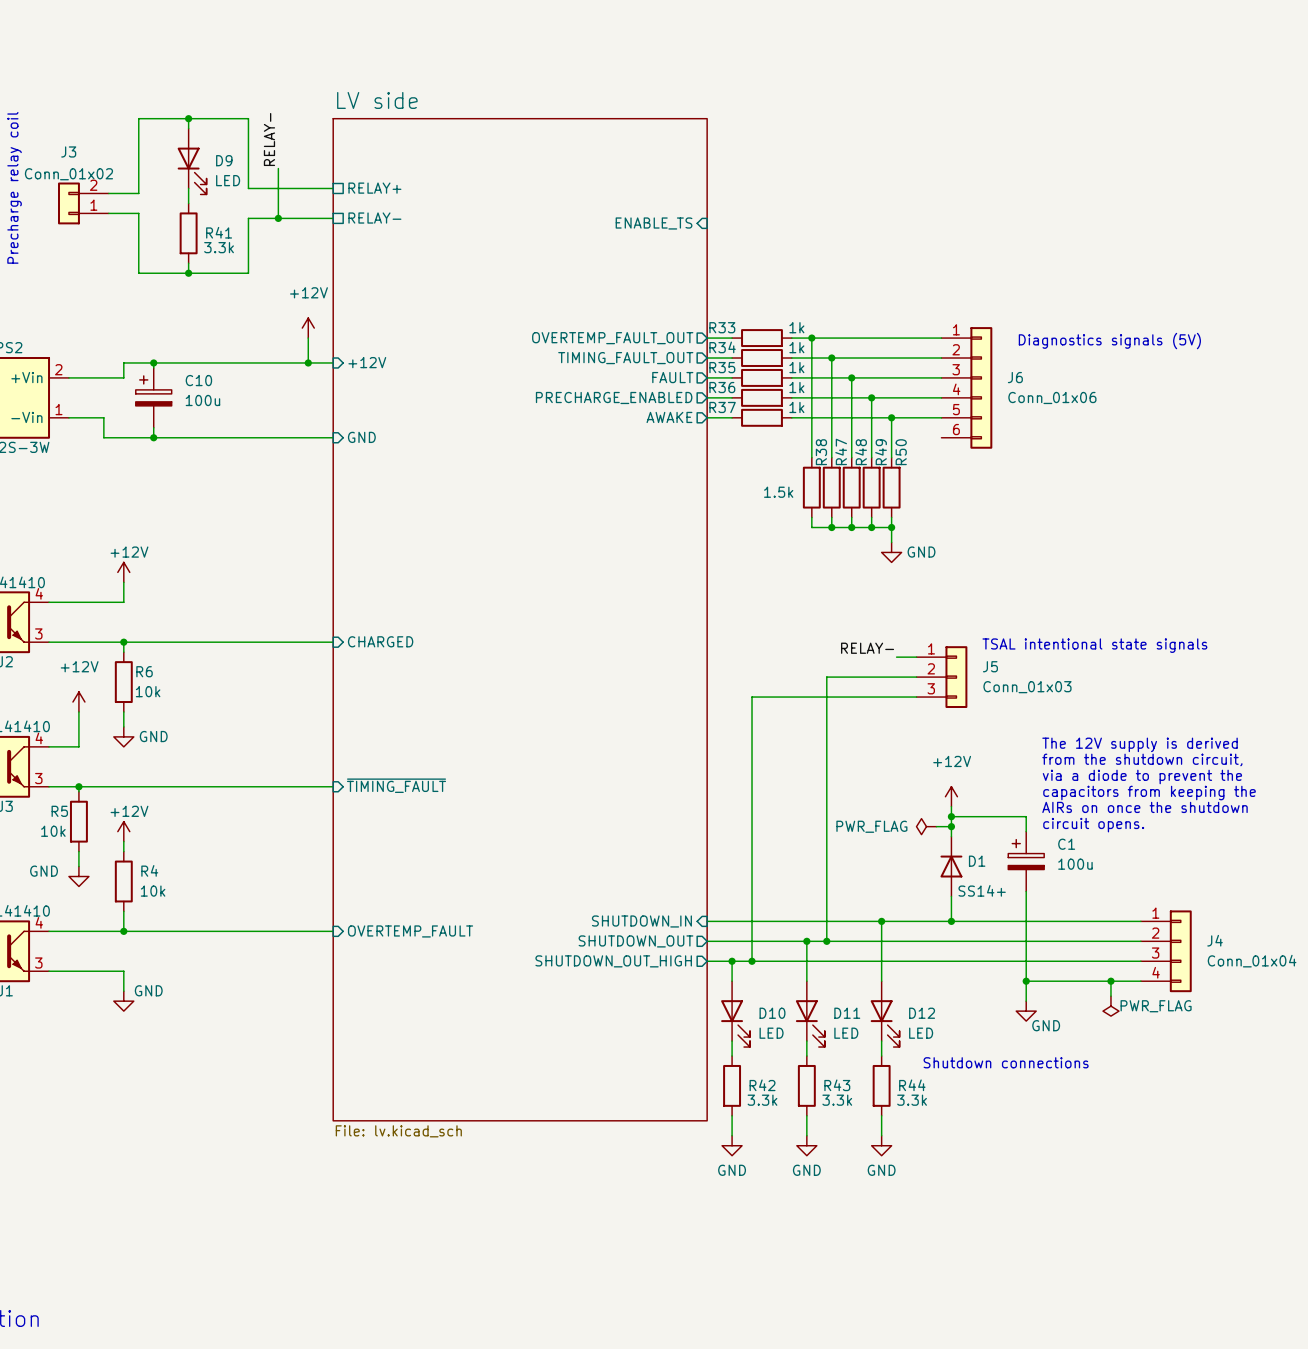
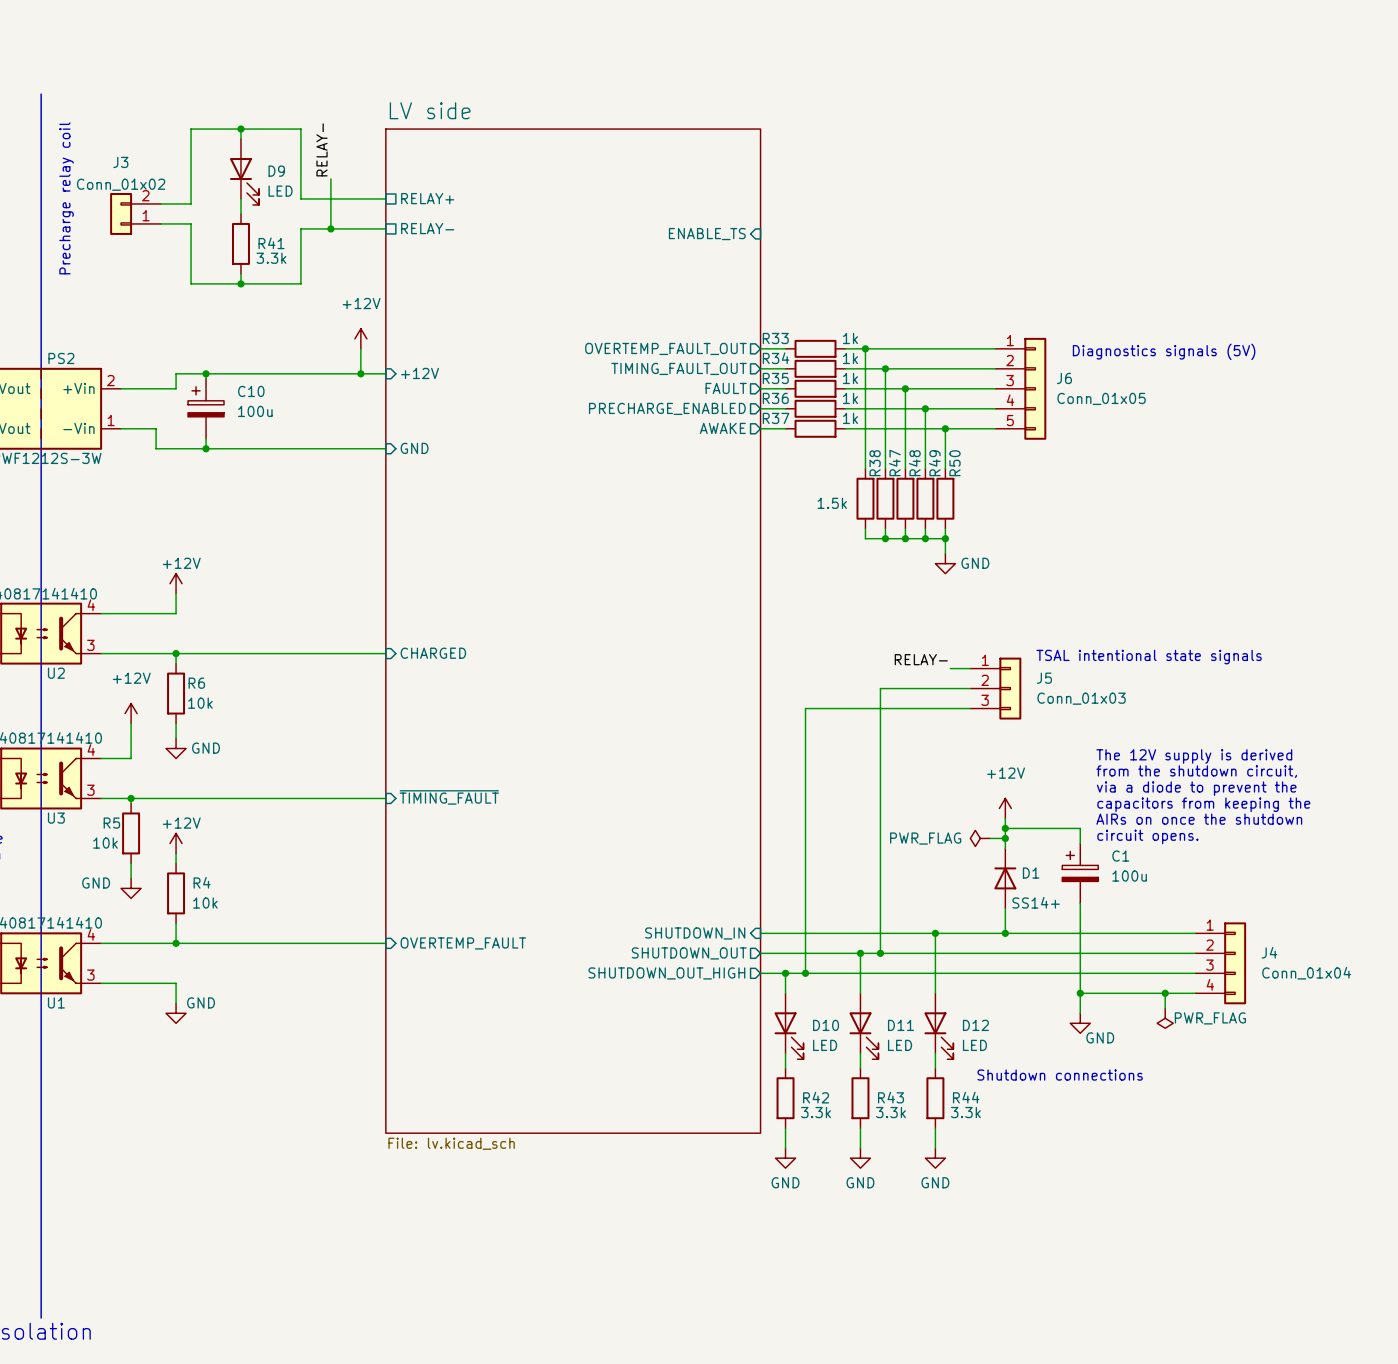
J6 symbol: [941, 327, 993, 449] -> [995, 337, 1047, 440]
J6 value: Conn_01x06 (1052, 397) -> Conn_01x05 (1101, 398)

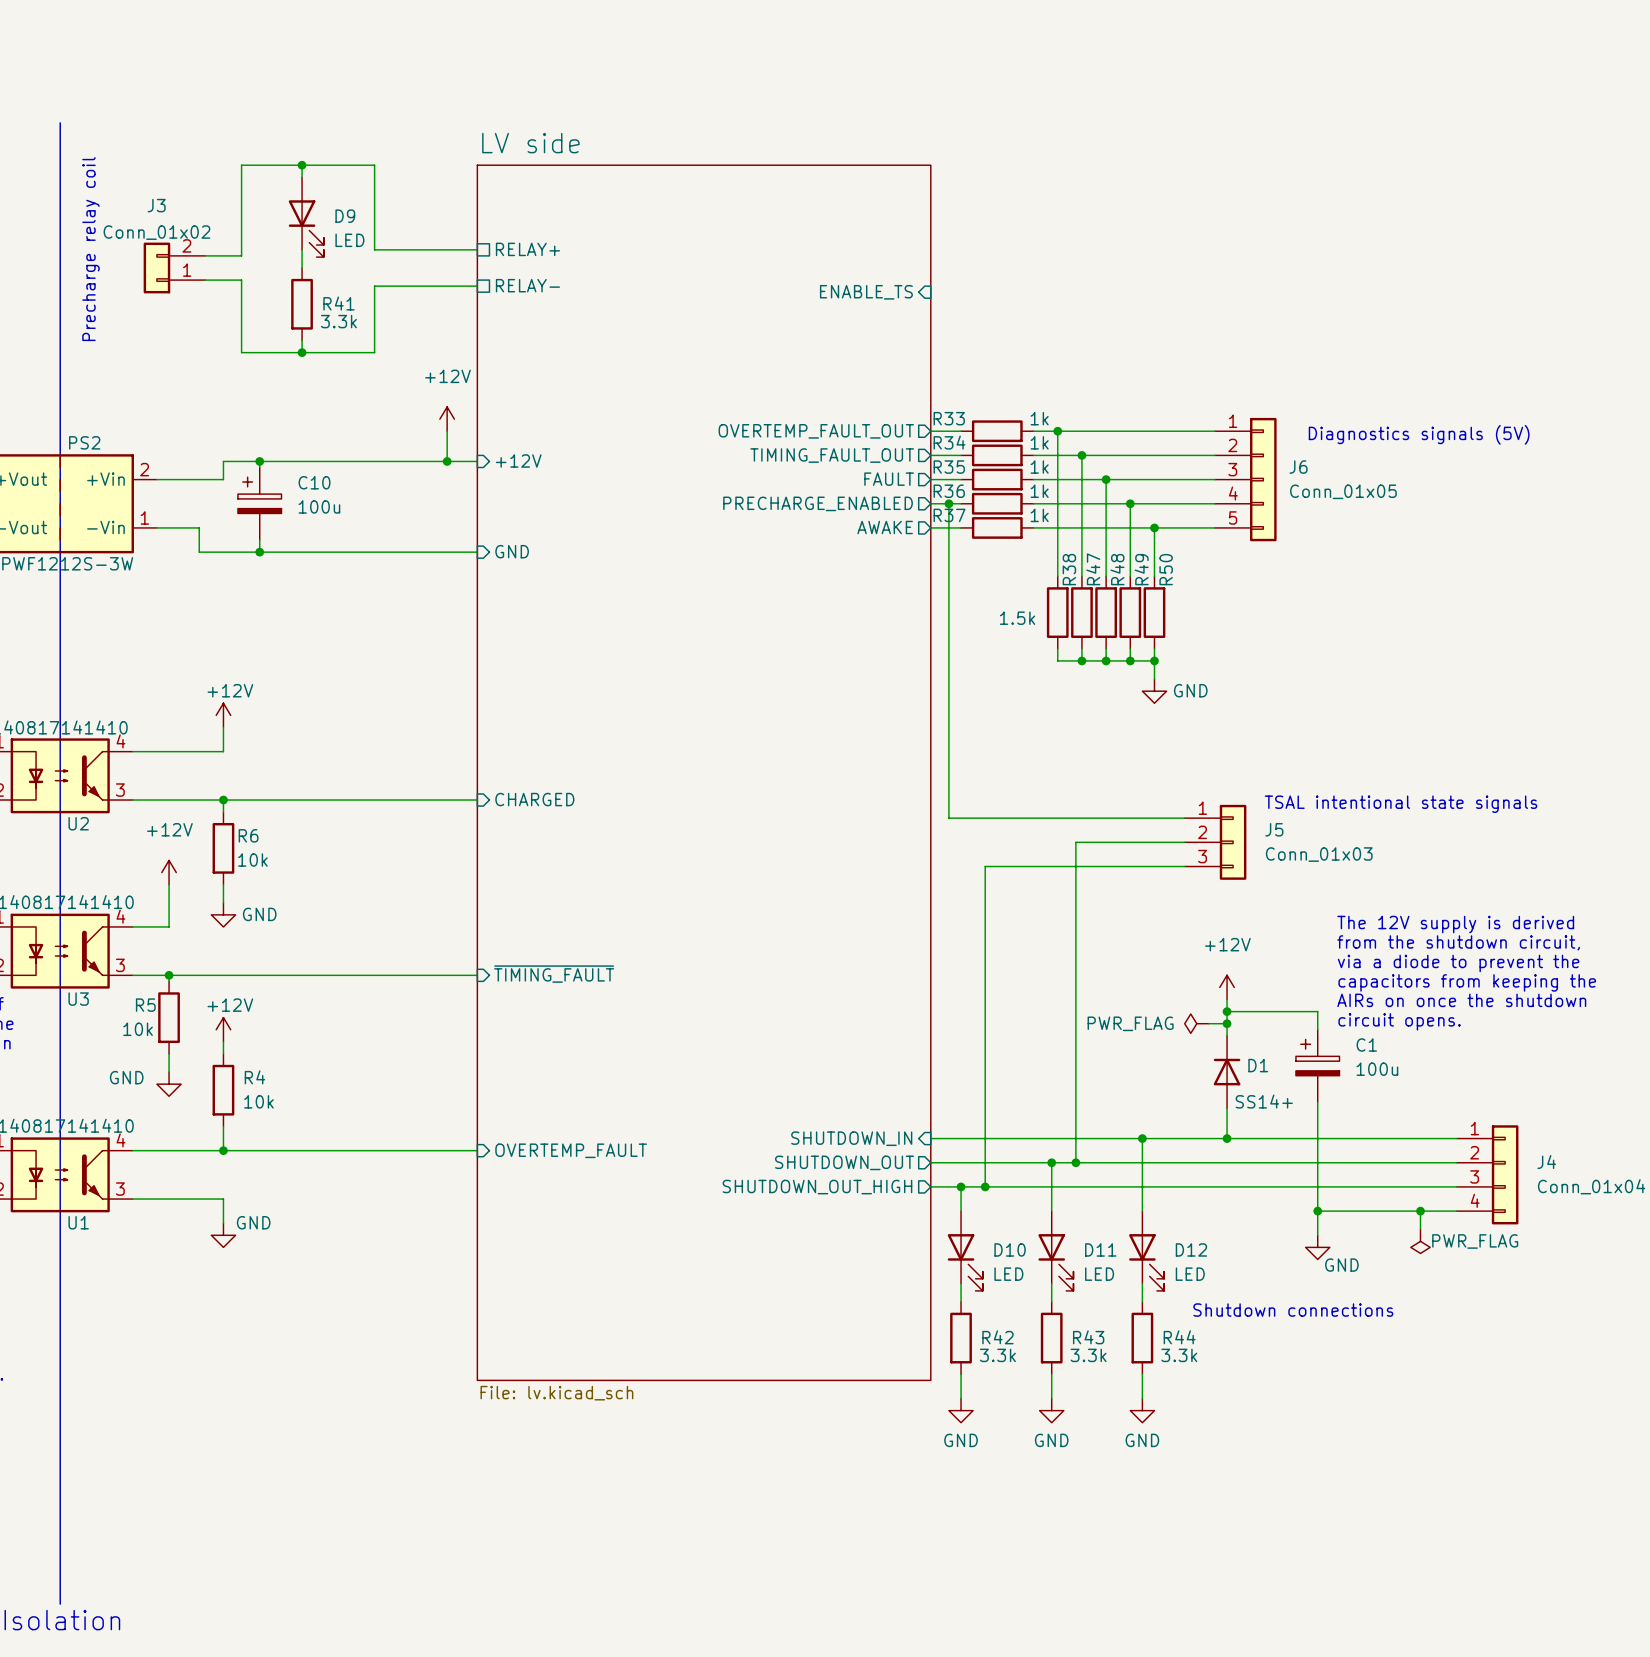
label: RELAY- (321, 149) -> none
wire: (330, 179) (330, 228) -> none
junction: (330, 228) -> none
wire: none -> (948, 503) (948, 818) (1160, 818)
junction: none -> (948, 503)
label: RELAY- (921, 659) -> none

